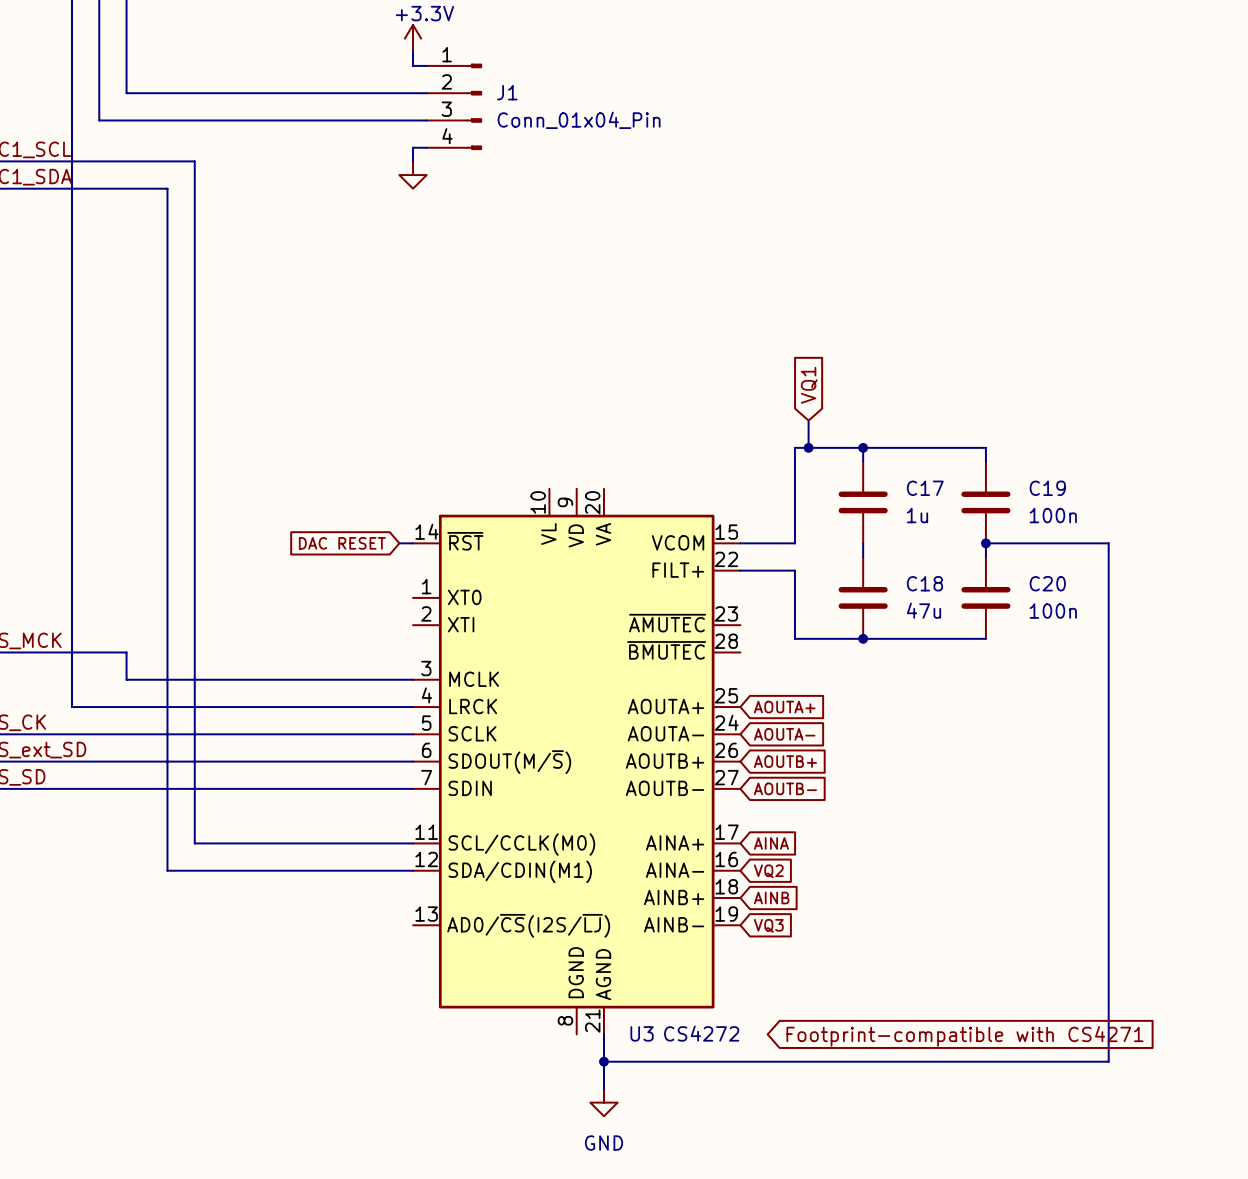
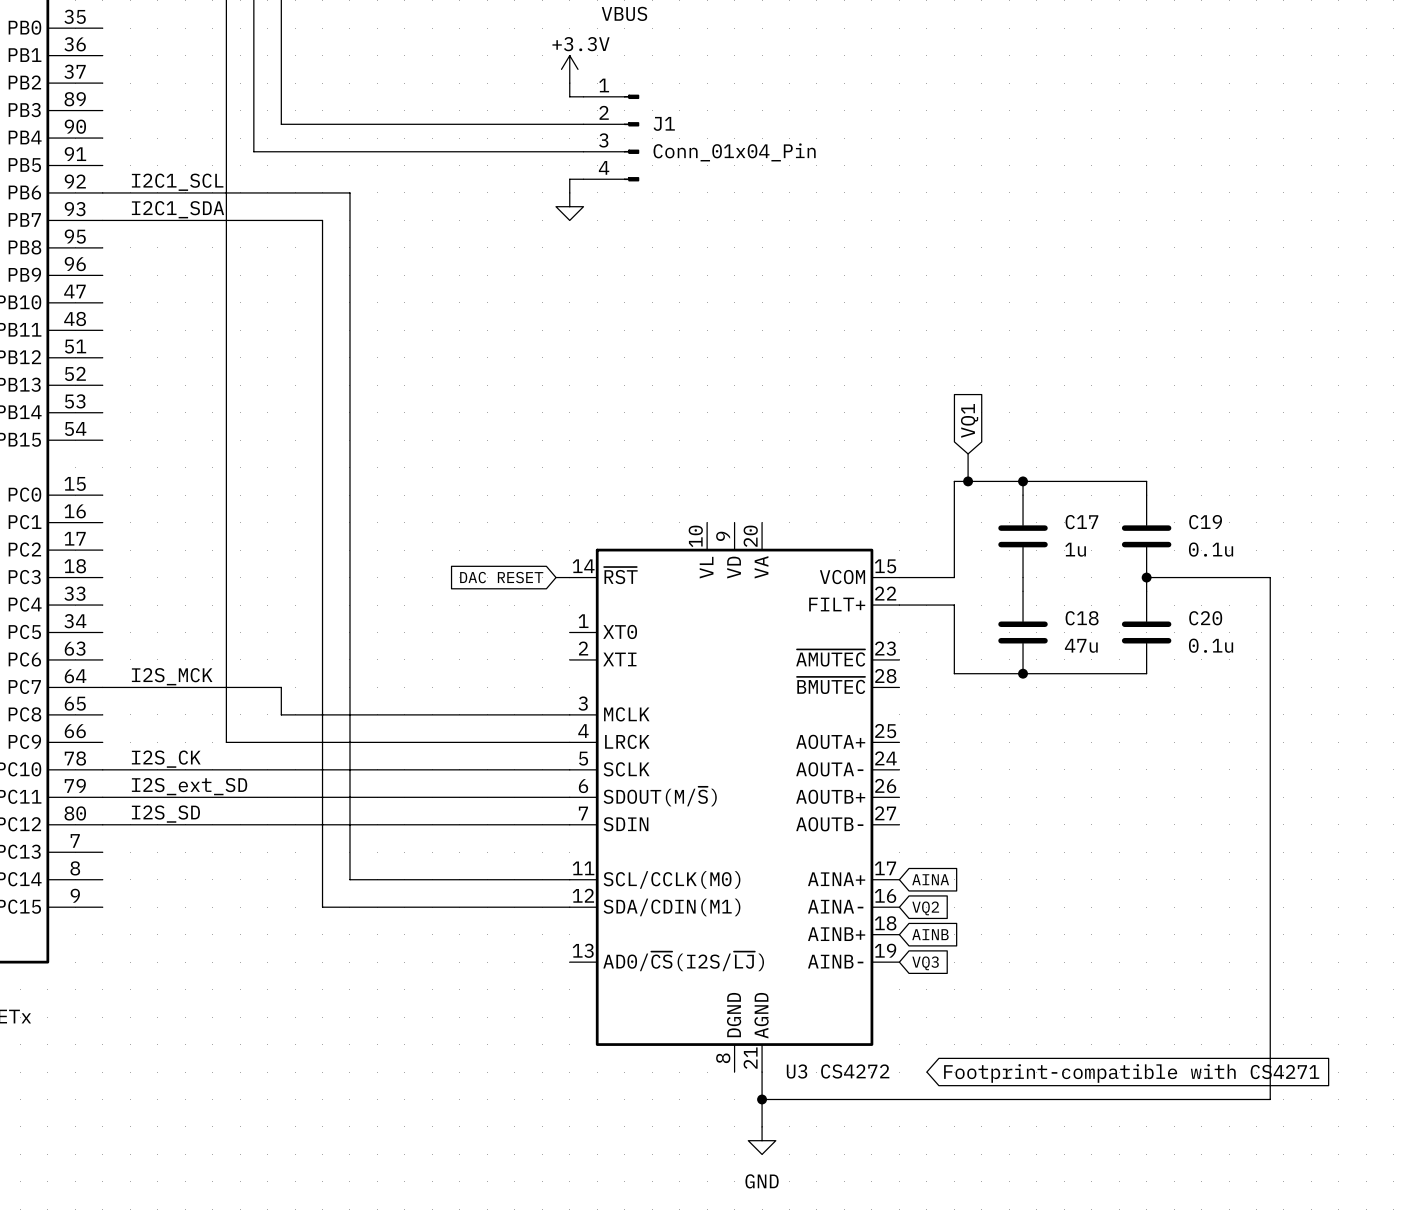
C19 value: 100n (1053, 515) -> 0.1u (1211, 549)
C20 value: 100n (1053, 611) -> 0.1u (1211, 645)
global label: AOUTA+ (784, 707) -> none
global label: AOUTA- (784, 734) -> none
global label: AOUTB+ (785, 761) -> none
global label: AOUTB- (785, 788) -> none

